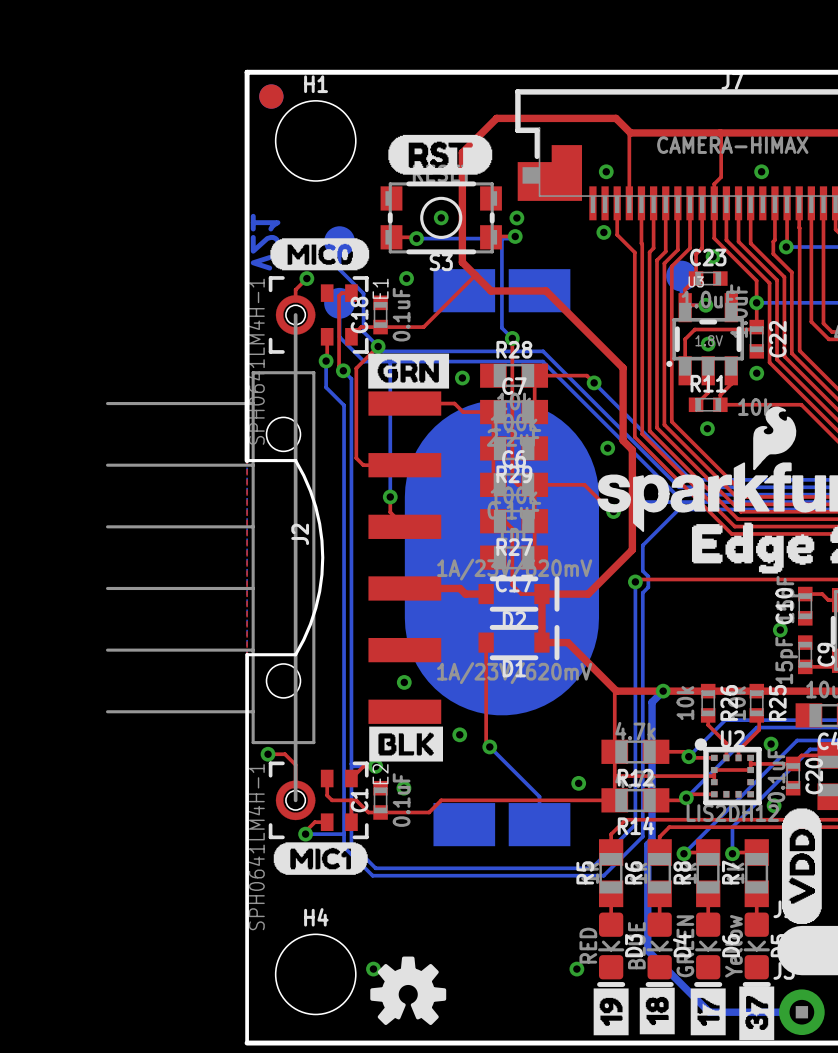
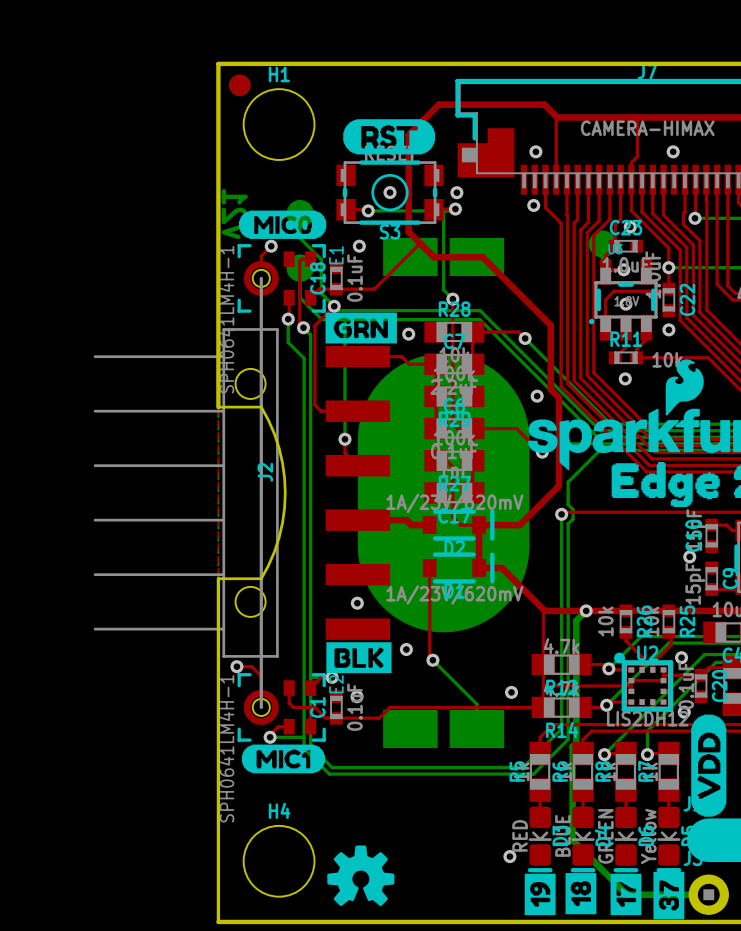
via: (373, 969) -> none

